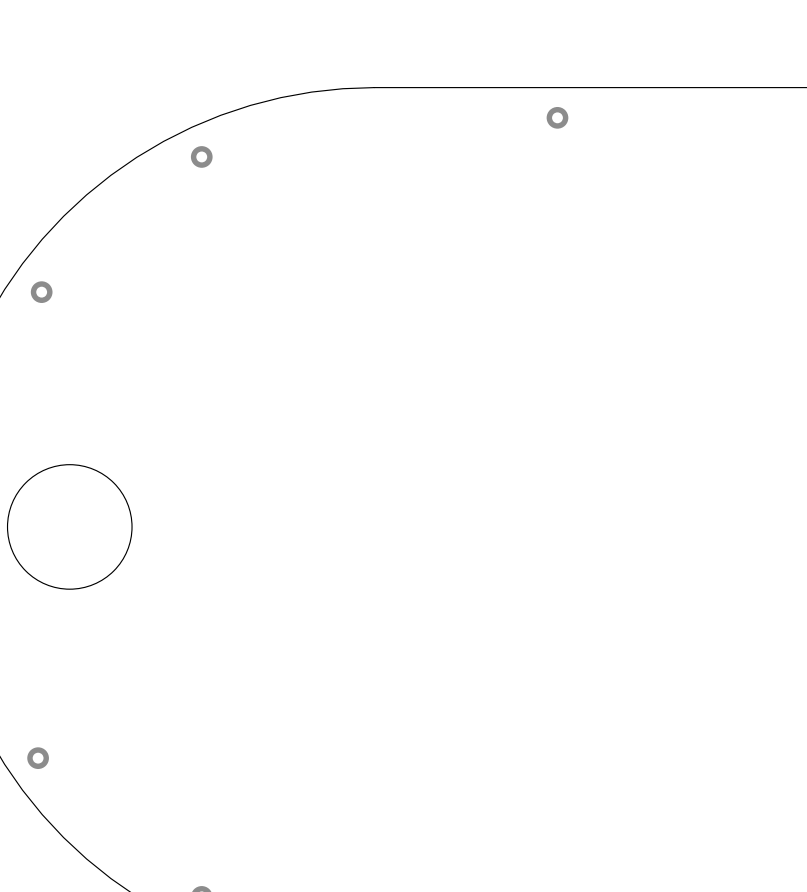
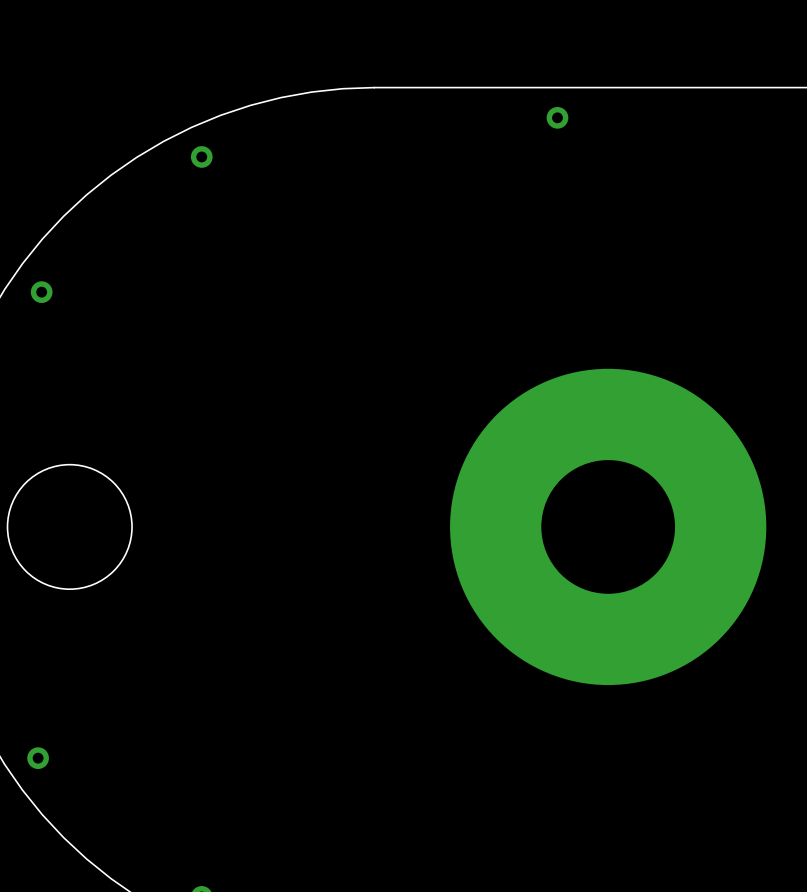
part: none -> (608, 526)

